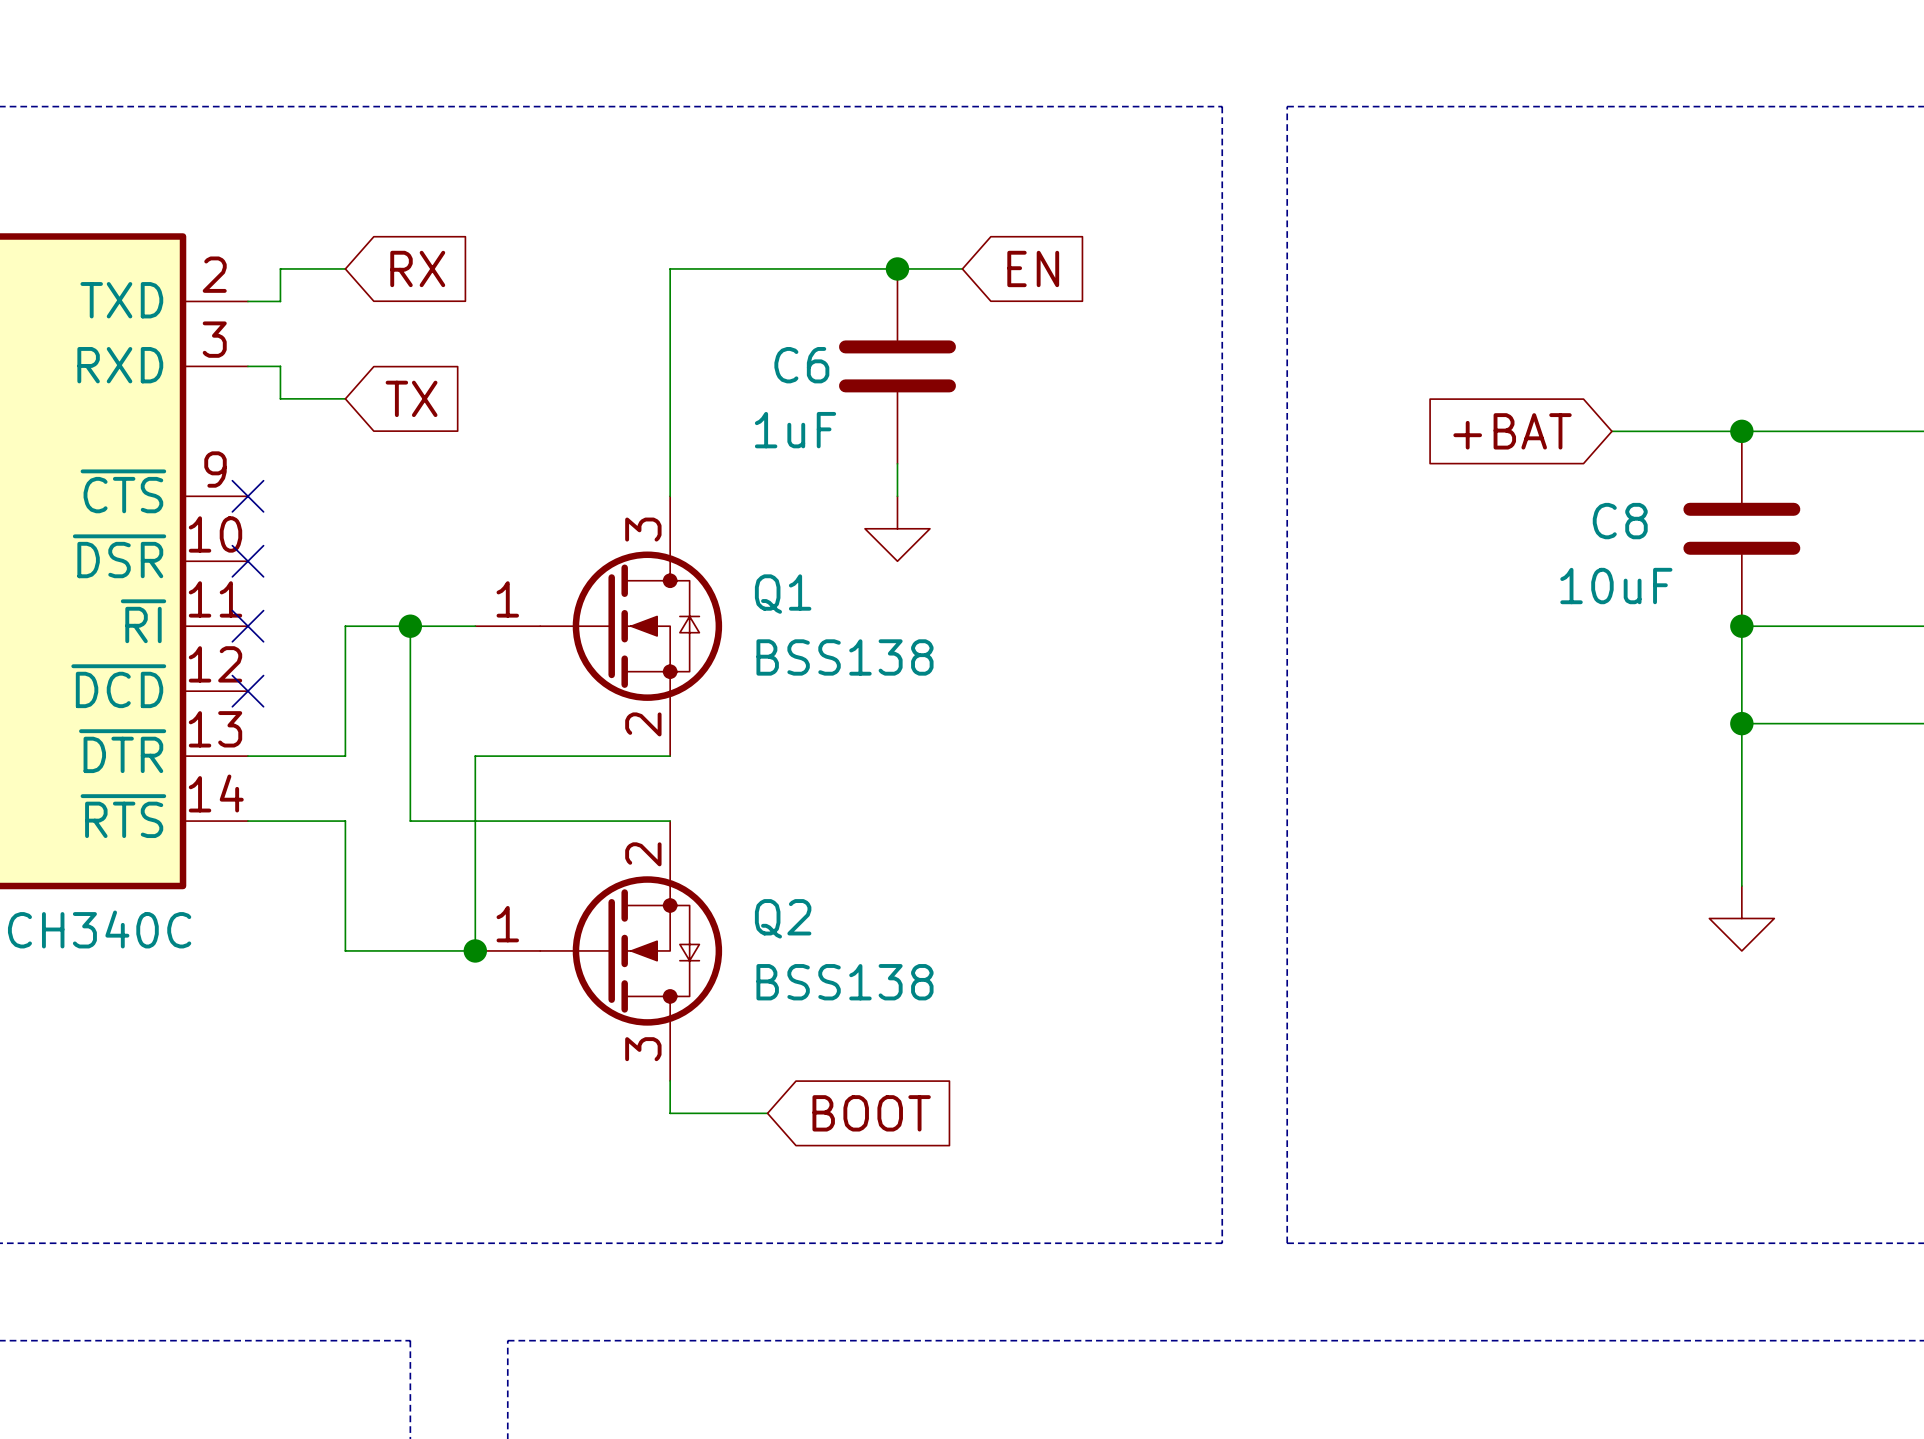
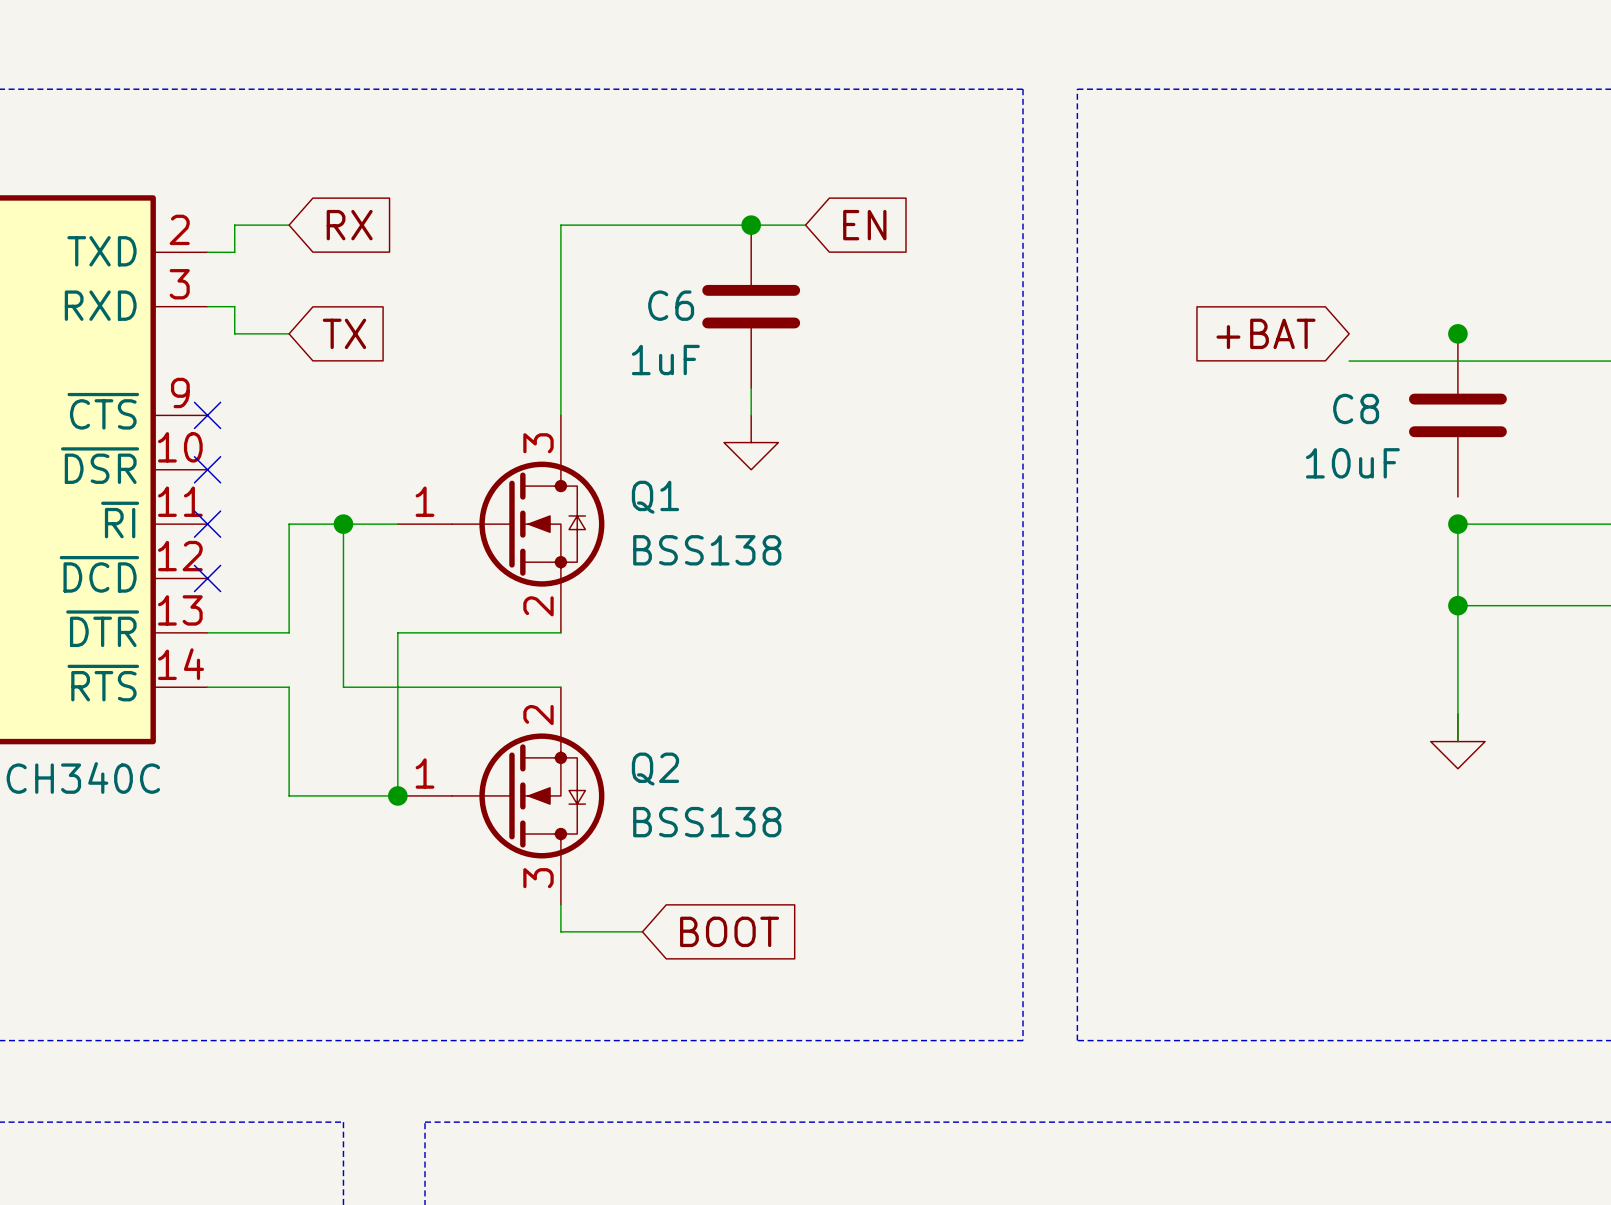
global label position: +BAT (1512, 431) -> +BAT (1265, 333)
junction position: (1741, 431) -> (1457, 333)
C8 position: (1741, 528) -> (1457, 415)
power symbol position: (1741, 918) -> (1457, 741)

